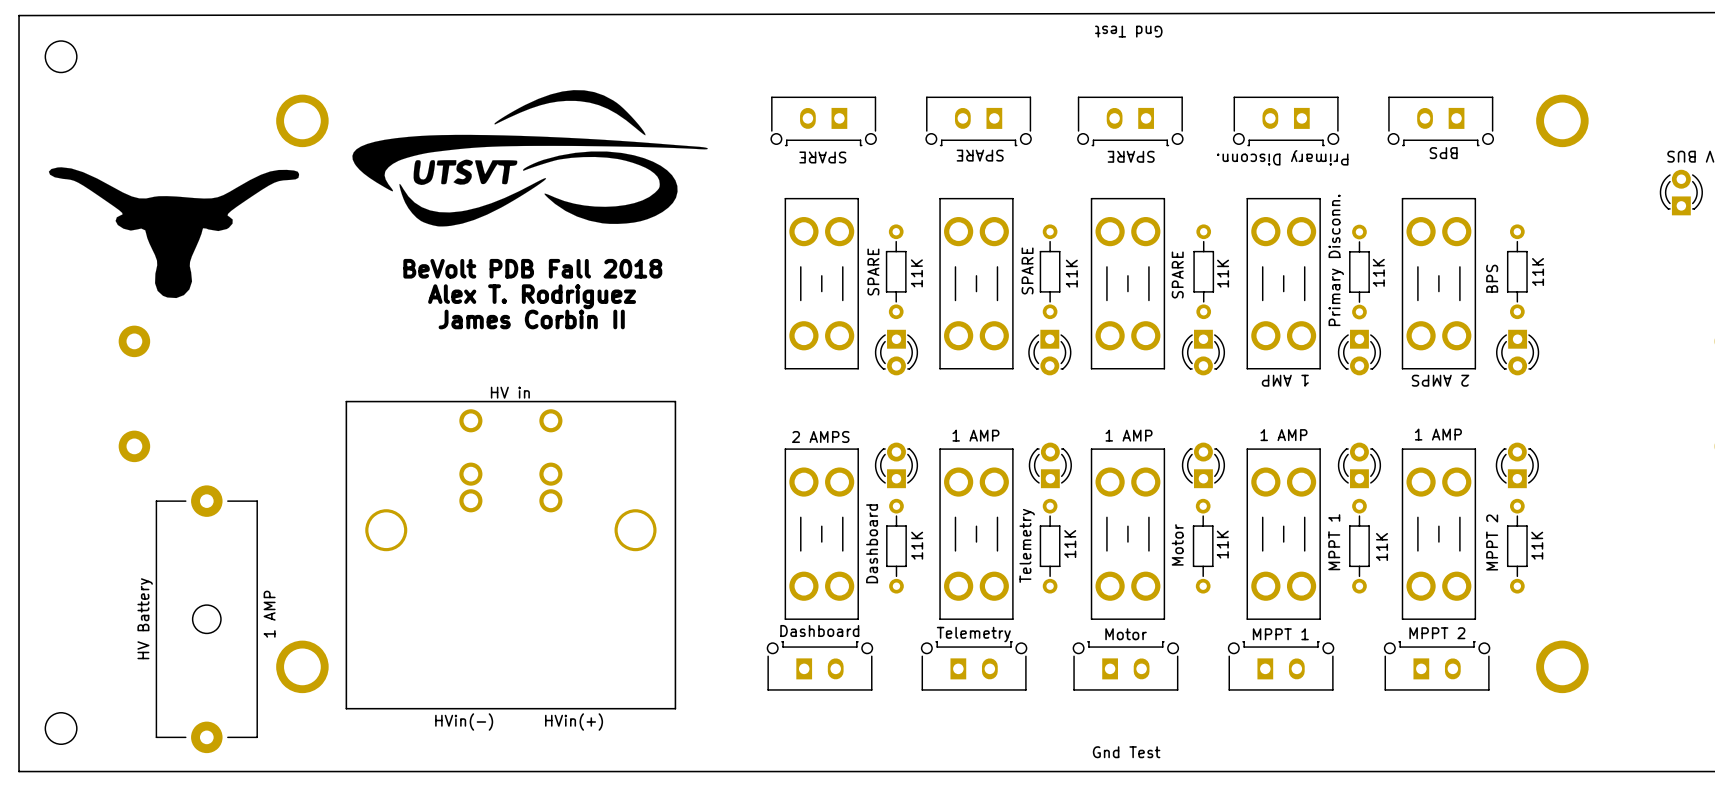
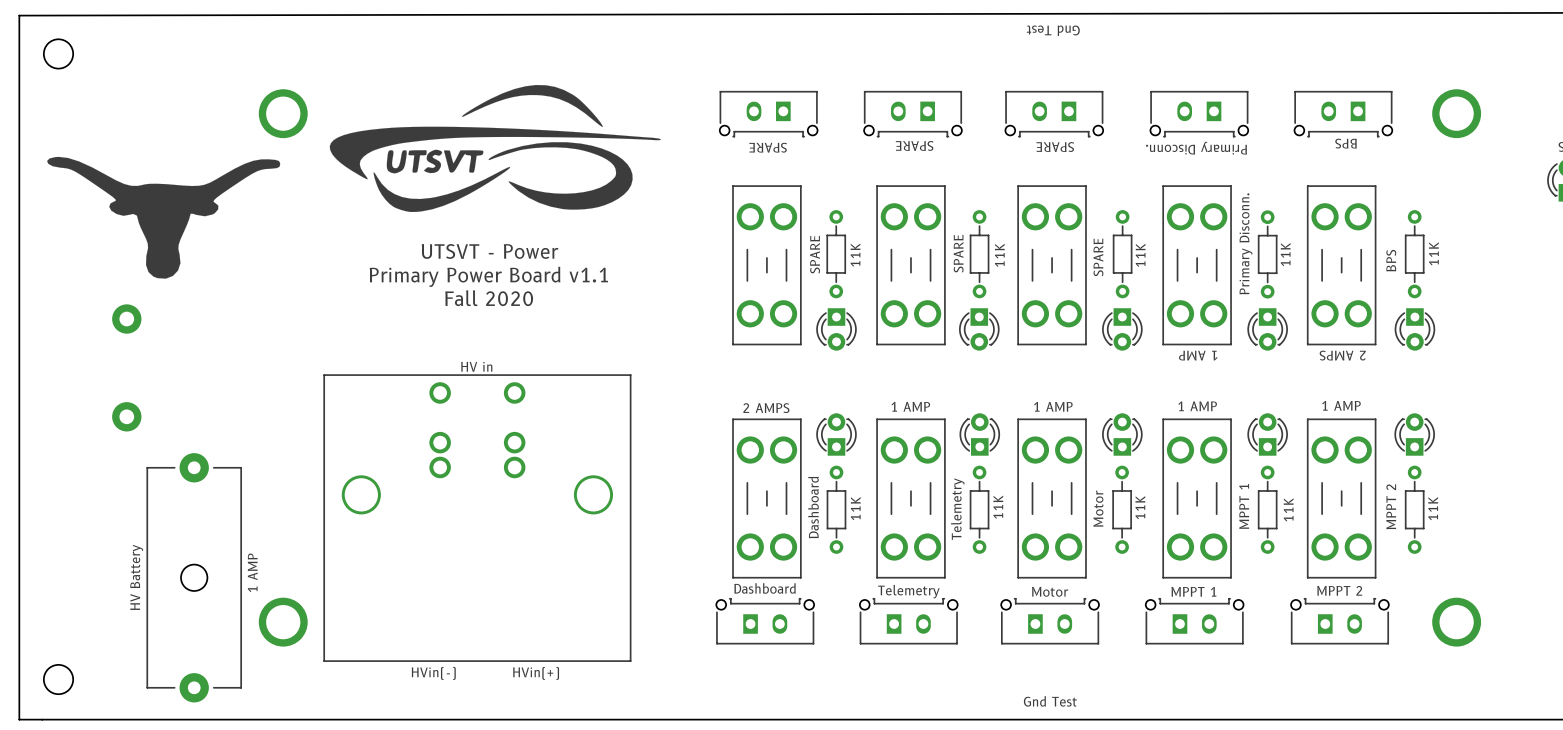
text: BeVolt PDB Fall 2018 (532, 268) -> UTSVT - Power (490, 251)
text: Alex T. Rodriguez (532, 296) -> Primary Power Board v1.1 (488, 276)
text: James Corbin II (531, 319) -> Fall 2020 (489, 298)

